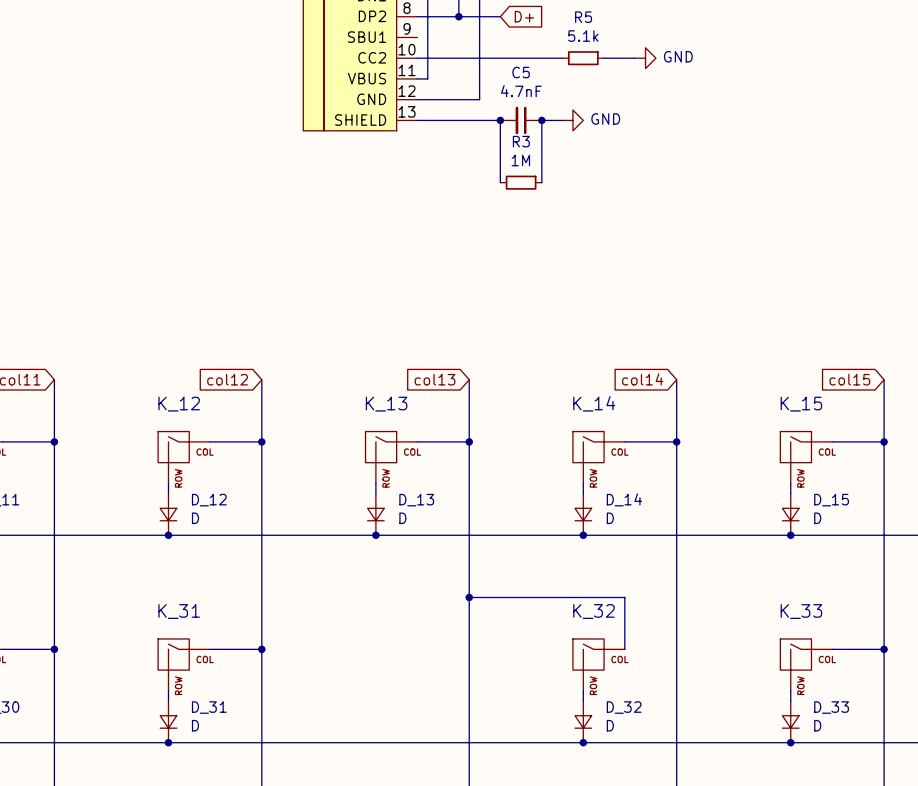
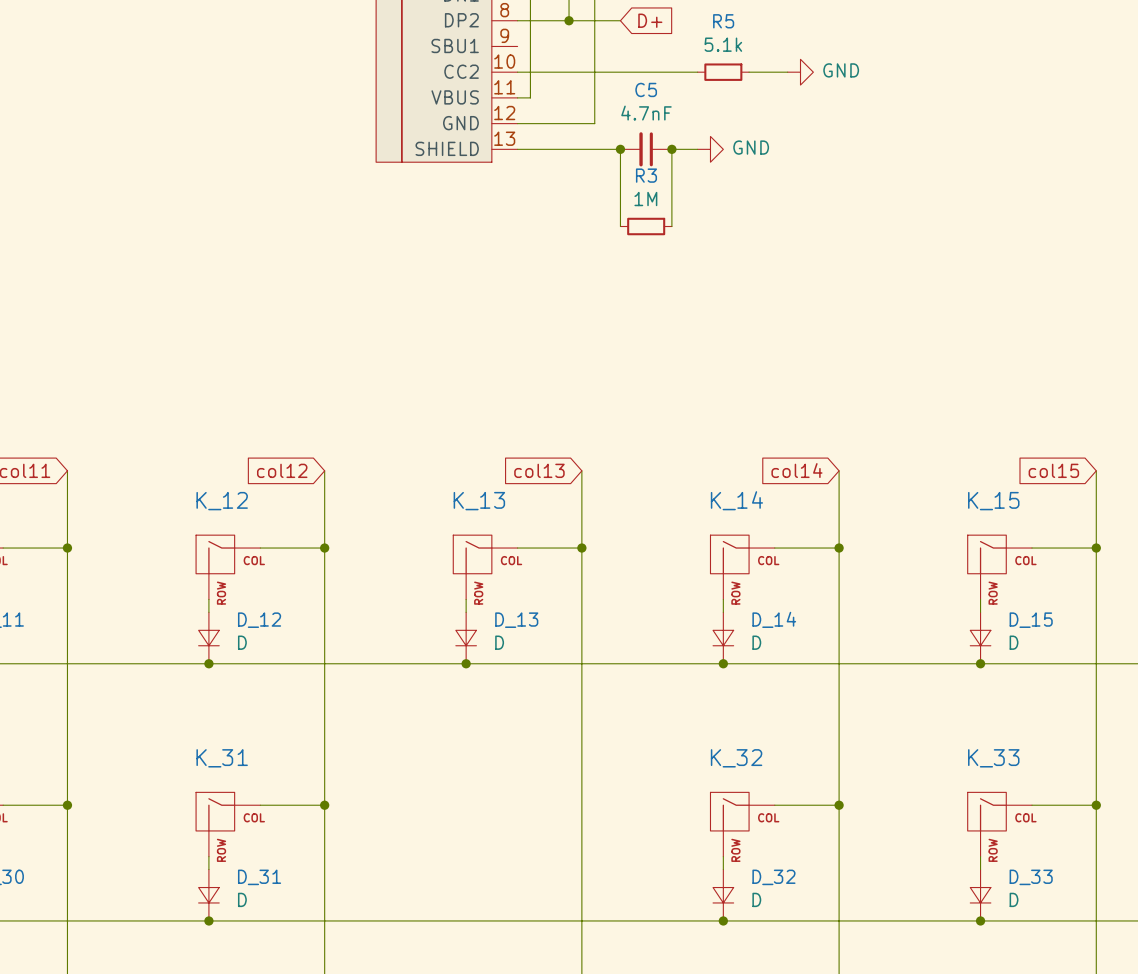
wire: (469, 597) (624, 597) (624, 649) -> (839, 805) (774, 805)
junction: (469, 597) -> none
junction: none -> (839, 805)

